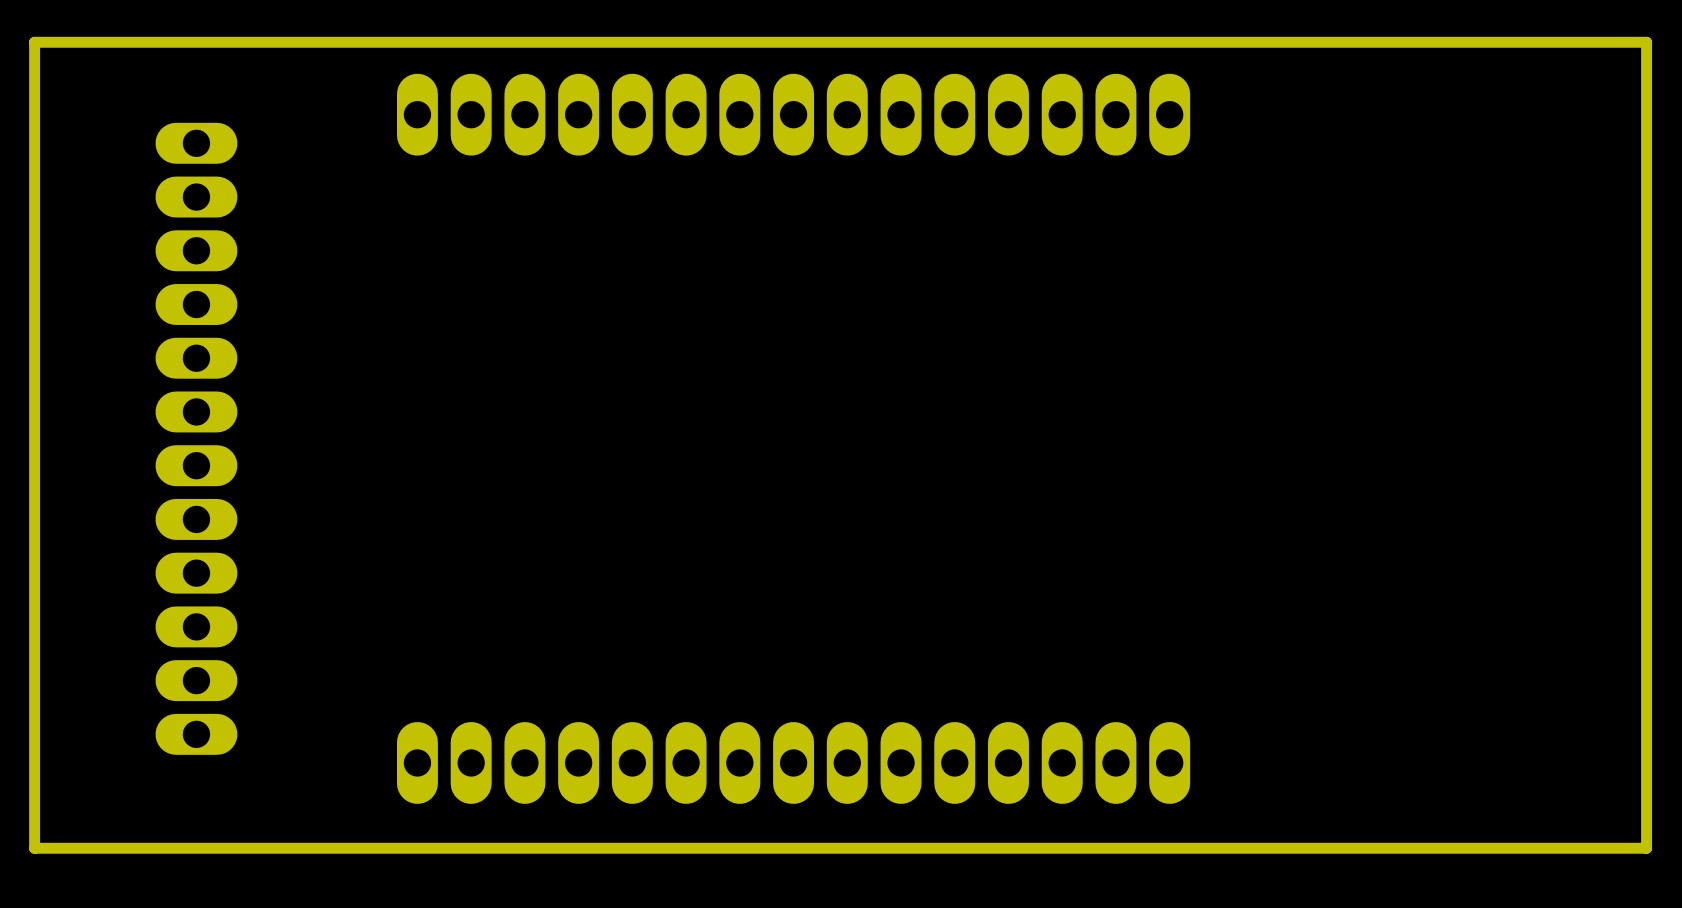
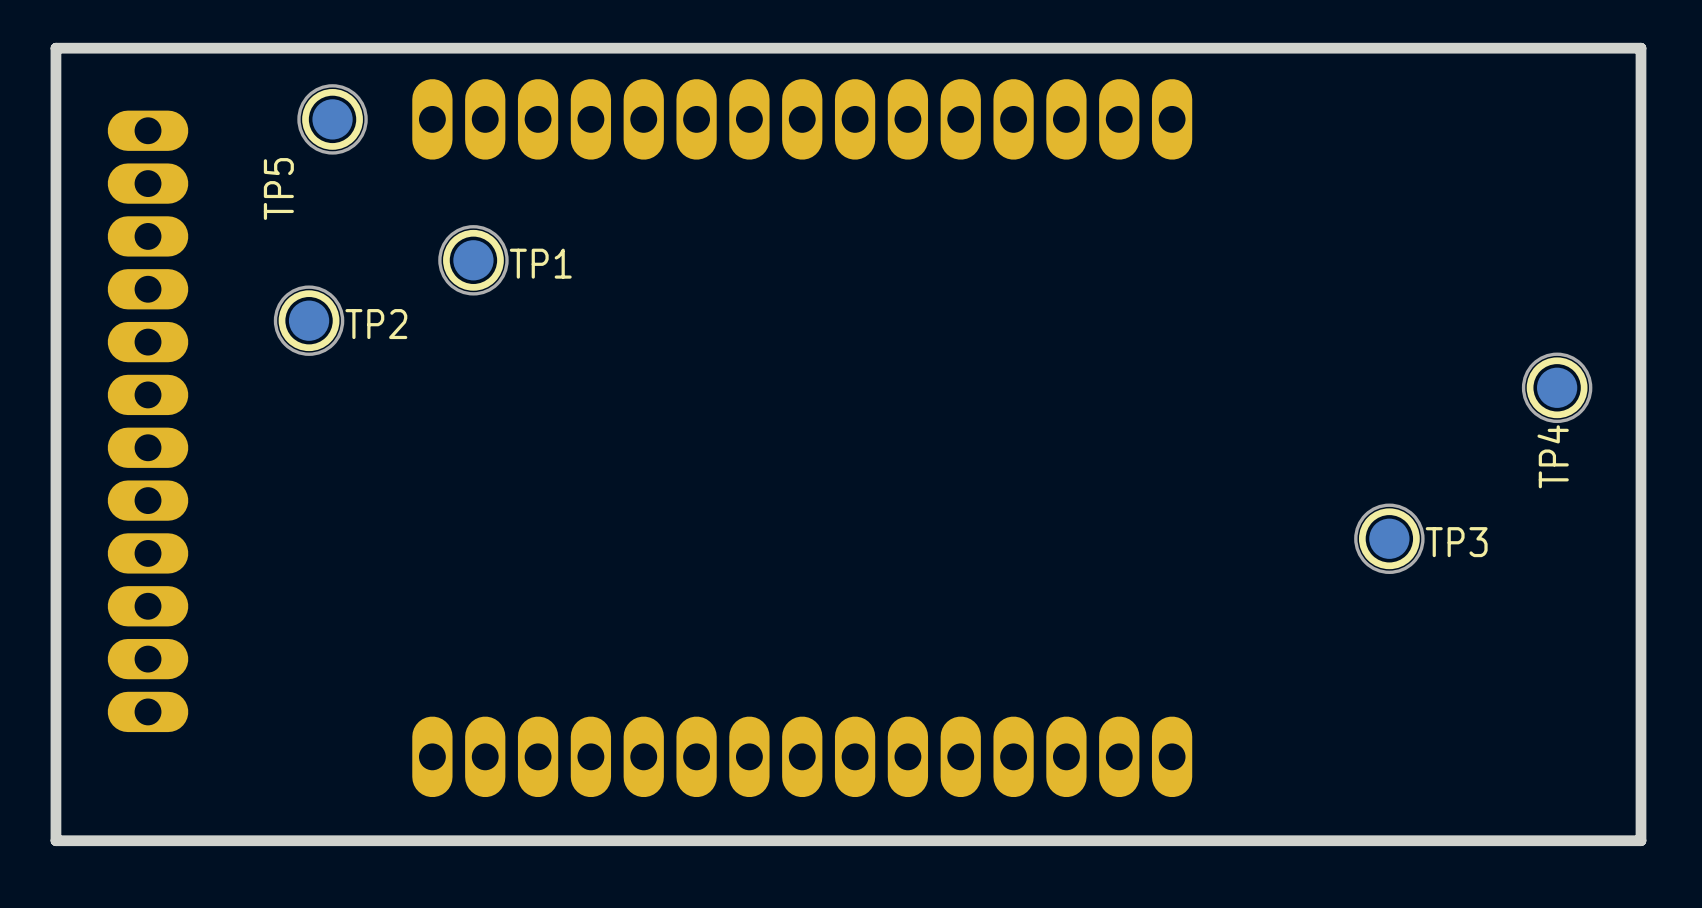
TP5: none -> (332, 119)
TP1: none -> (473, 260)
TP2: none -> (309, 320)
TP4: none -> (1557, 387)
part position: (196, 438) -> (148, 421)
TP3: none -> (1389, 538)

